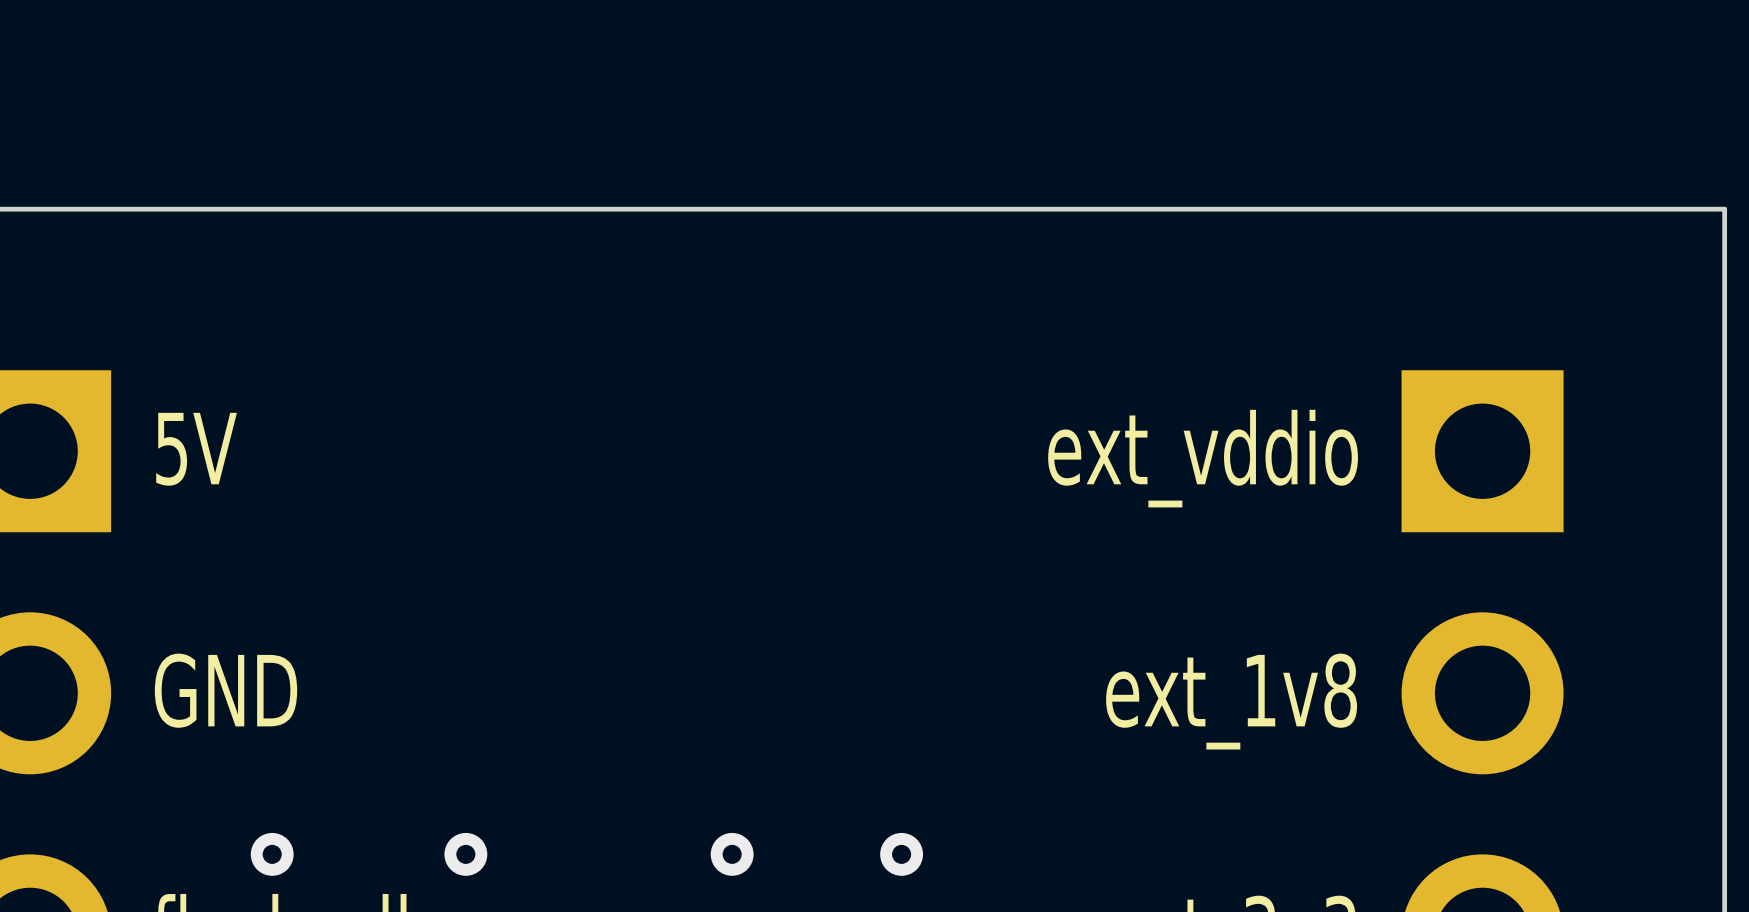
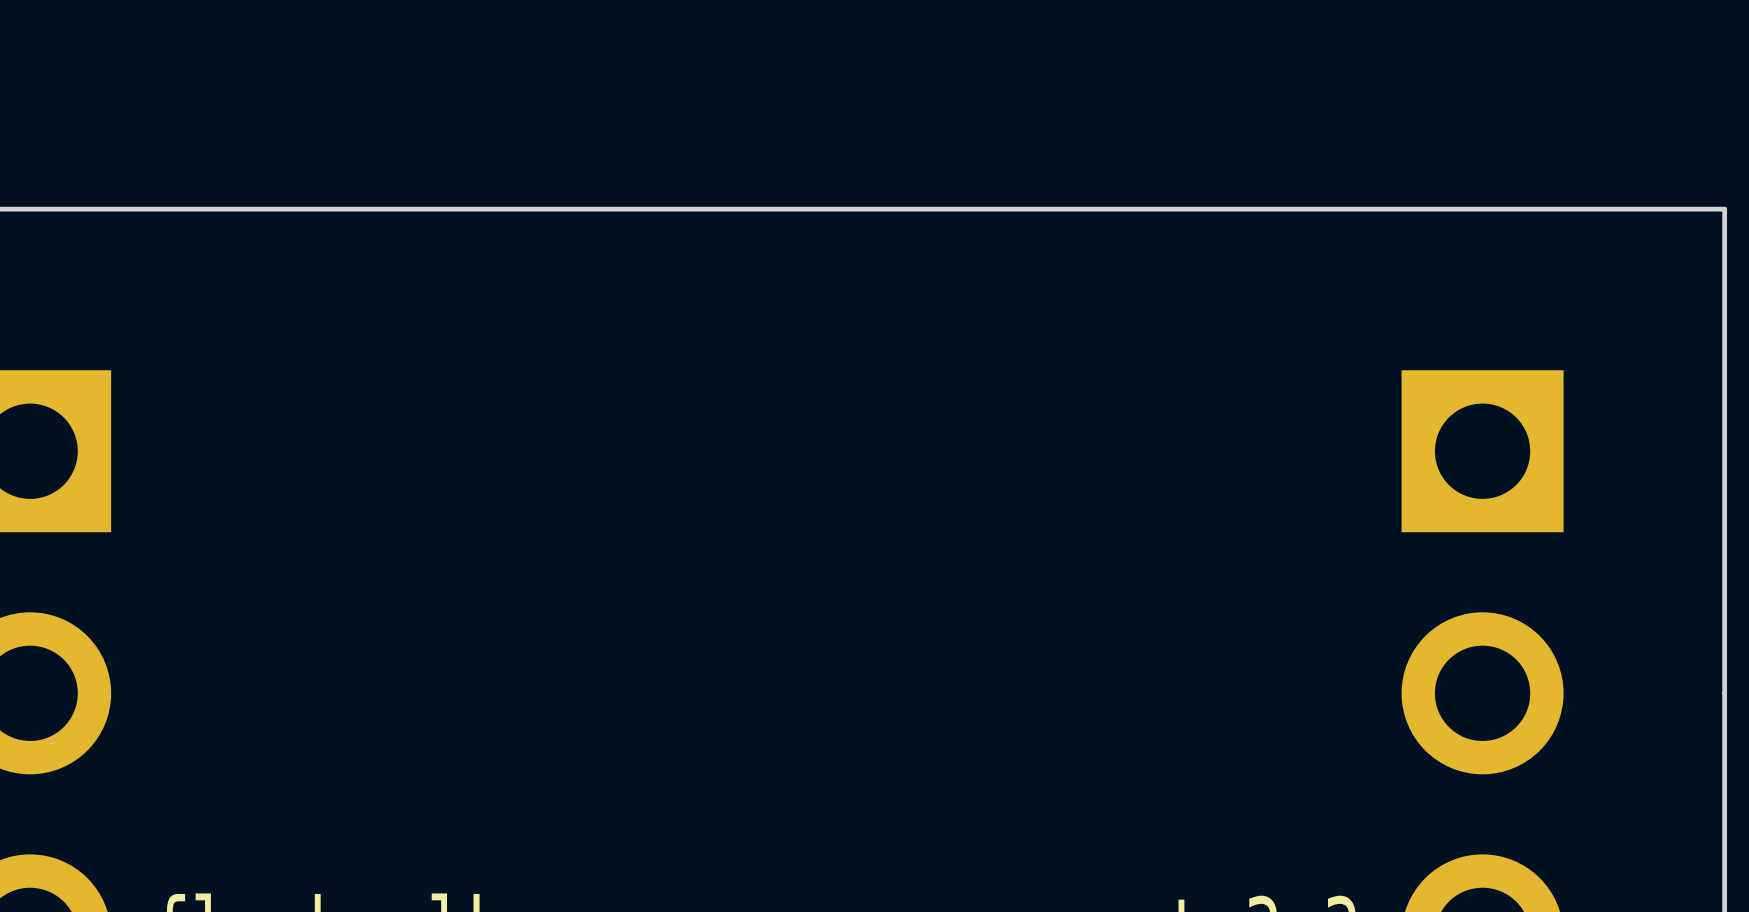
text: 5V (196, 449) -> none
text: ext_vddio (1203, 458) -> none
text: GND (226, 690) -> none
text: ext_1v8 (1231, 701) -> none
via: (272, 854) -> none
via: (465, 854) -> none
via: (732, 854) -> none
via: (901, 854) -> none

